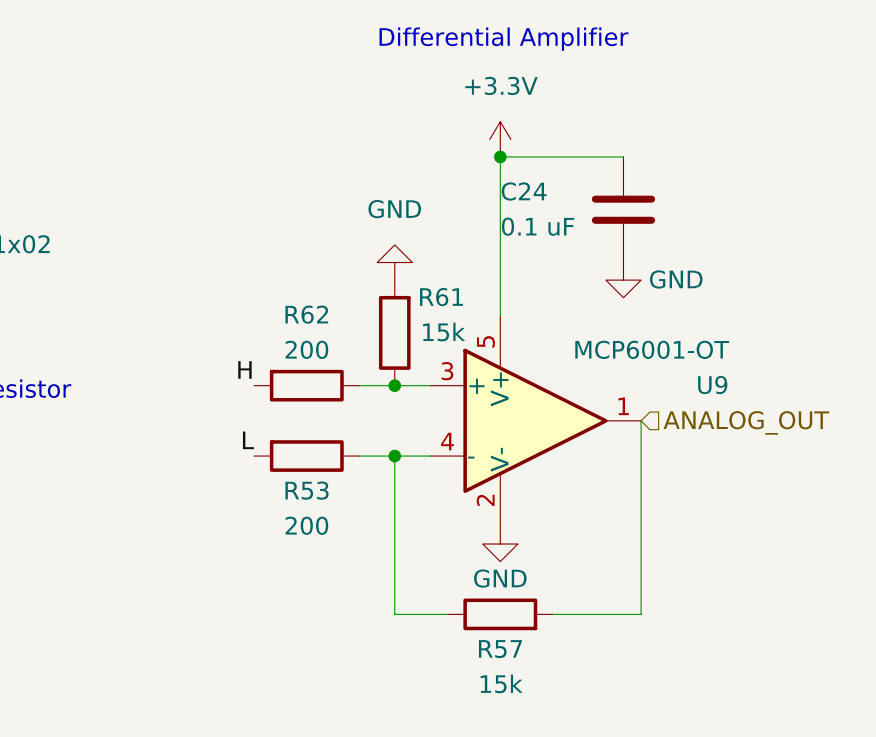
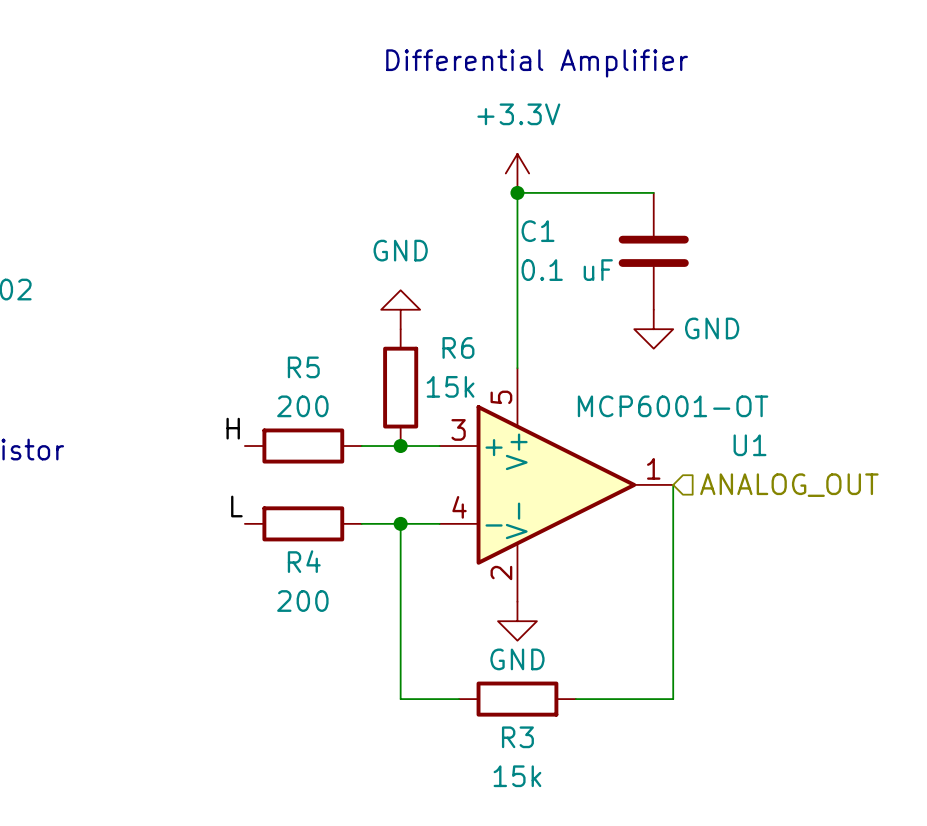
C24 name: C24 (524, 191) -> C1 (538, 231)
R61 name: R61 (441, 297) -> R6 (458, 347)
R62 name: R62 (306, 314) -> R5 (303, 367)
U9 name: U9 (712, 385) -> U1 (750, 445)
R53 name: R53 (307, 490) -> R4 (304, 561)
R57 name: R57 (500, 649) -> R3 (517, 737)

